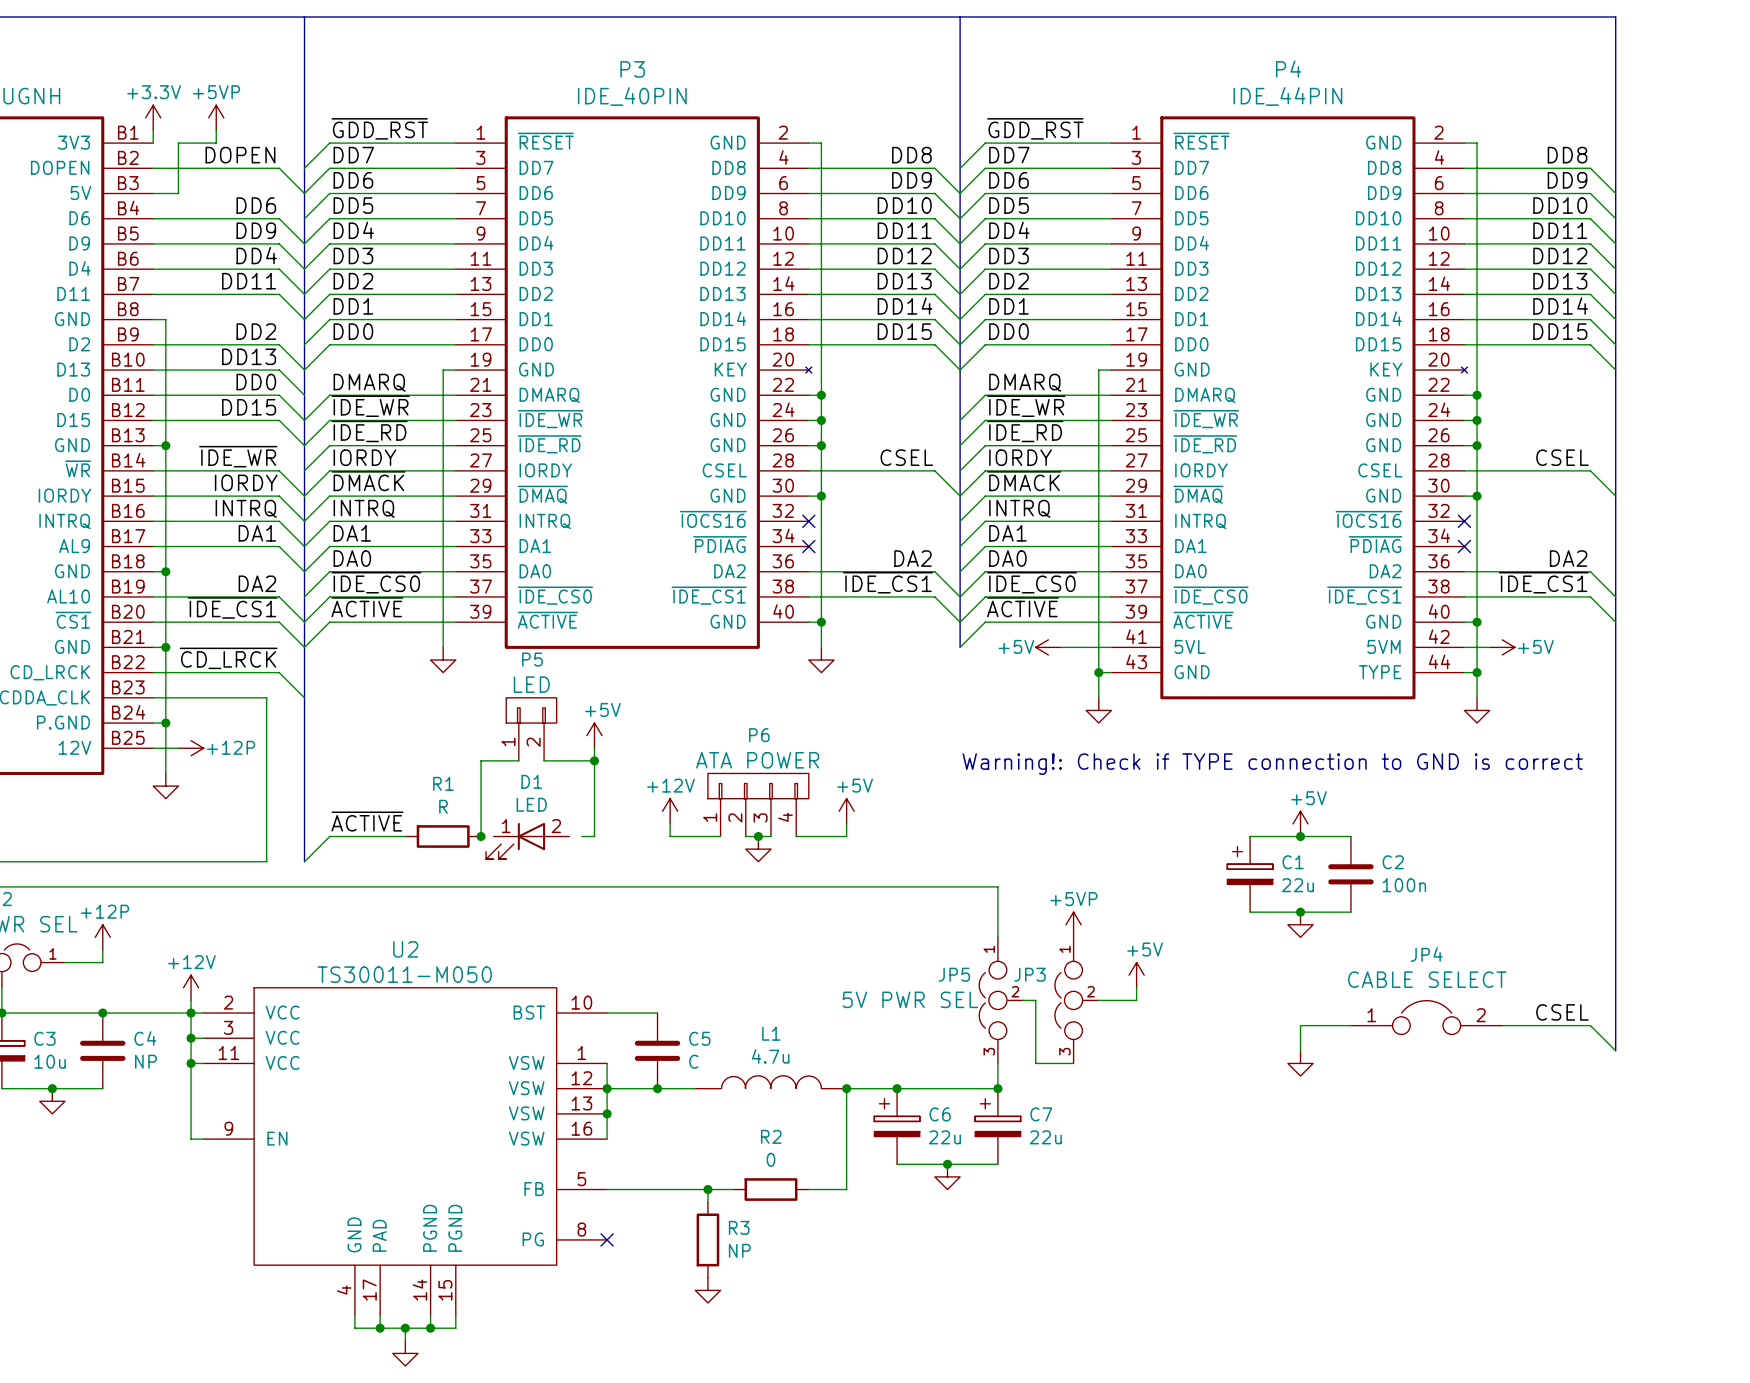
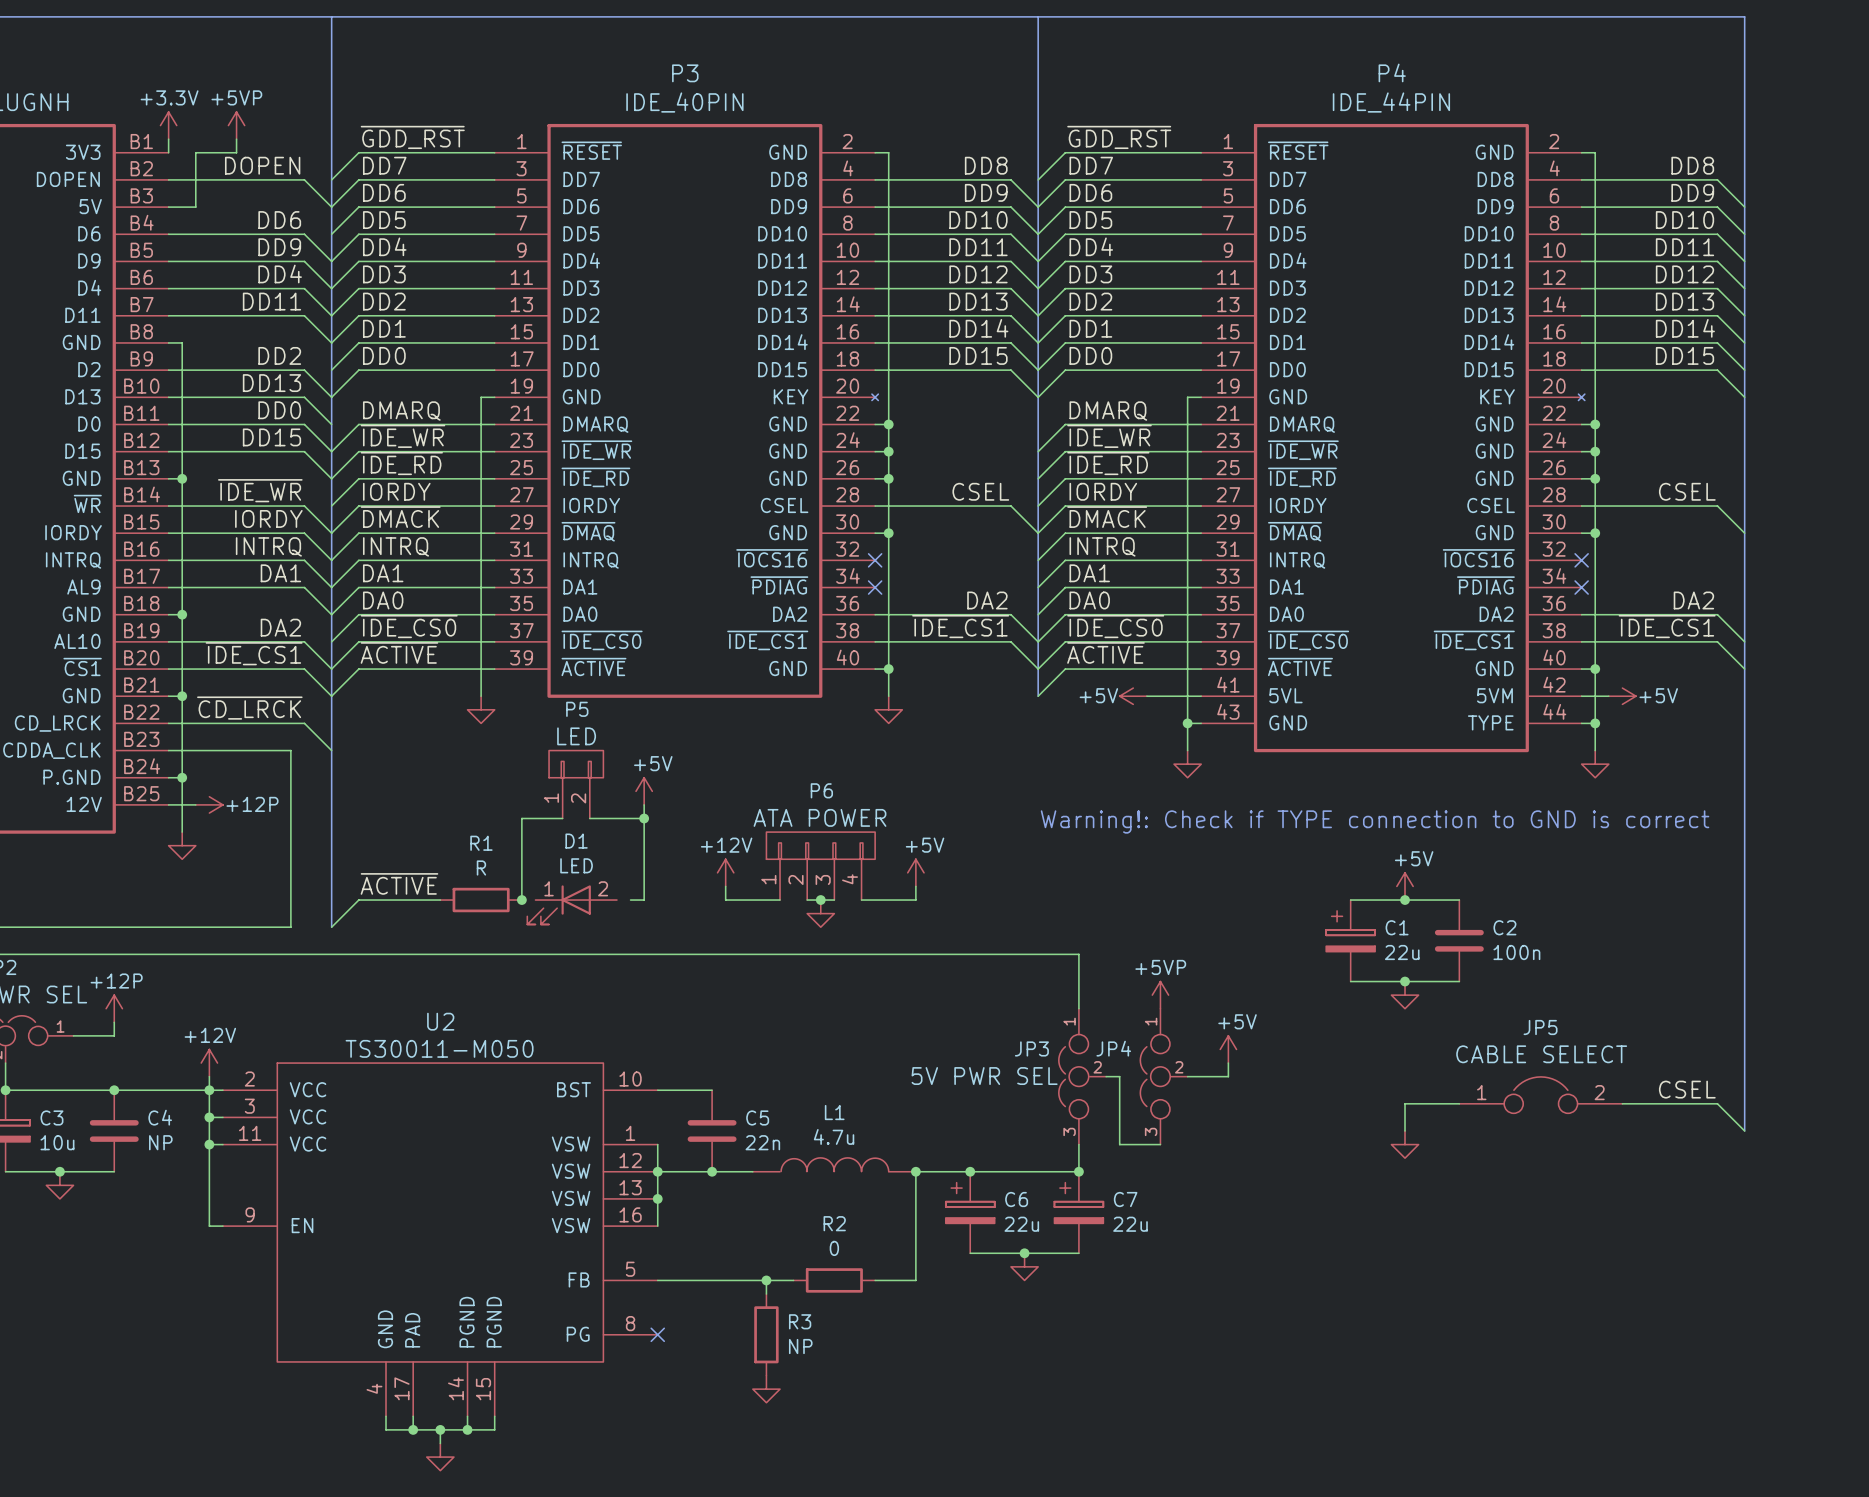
JP4 name: JP4 (1426, 954) -> JP5 (1540, 1027)
JP5 name: JP5 (954, 974) -> JP3 (1031, 1048)
JP3 name: JP3 (1029, 974) -> JP4 (1113, 1048)
C5 value: C (693, 1061) -> 22n (762, 1142)

